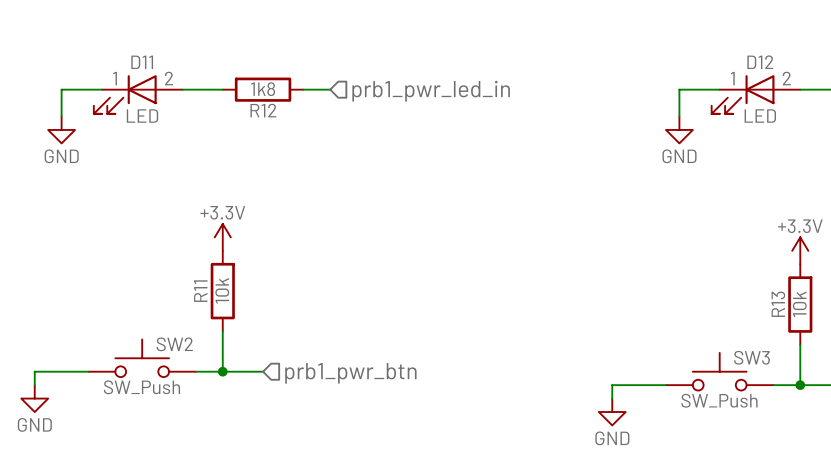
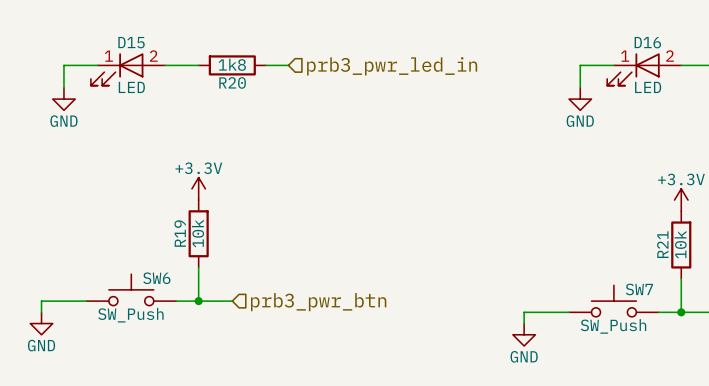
D11 name: D11 (142, 62) -> D15 (131, 42)
D12 name: D12 (760, 62) -> D16 (647, 42)
hierarchical label: prb1_pwr_led_in (431, 91) -> prb3_pwr_led_in (392, 66)
R12 name: R12 (263, 110) -> R20 (232, 82)
R11 name: R11 (200, 291) -> R19 (180, 233)
R13 name: R13 (778, 304) -> R21 (662, 244)
SW2 name: SW2 (174, 344) -> SW6 (156, 278)
SW3 name: SW3 (751, 357) -> SW7 (639, 289)
hierarchical label: prb1_pwr_btn (350, 373) -> prb3_pwr_btn (318, 302)

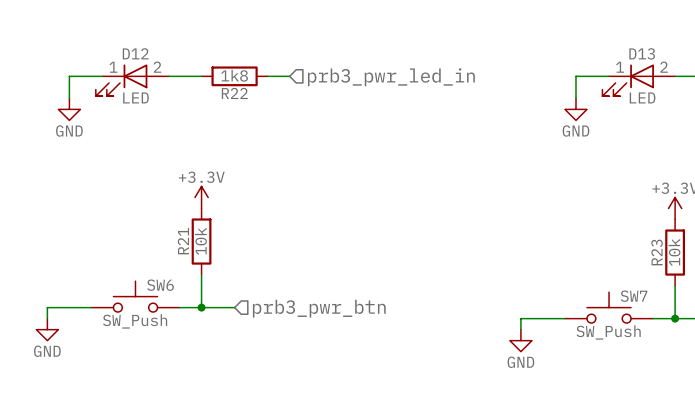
D15 name: D15 (131, 42) -> D12 (135, 53)
D16 name: D16 (647, 42) -> D13 (642, 53)
R20 name: R20 (232, 82) -> R22 (234, 93)
R19 name: R19 (180, 233) -> R21 (183, 241)
R21 name: R21 (662, 244) -> R23 (657, 252)

